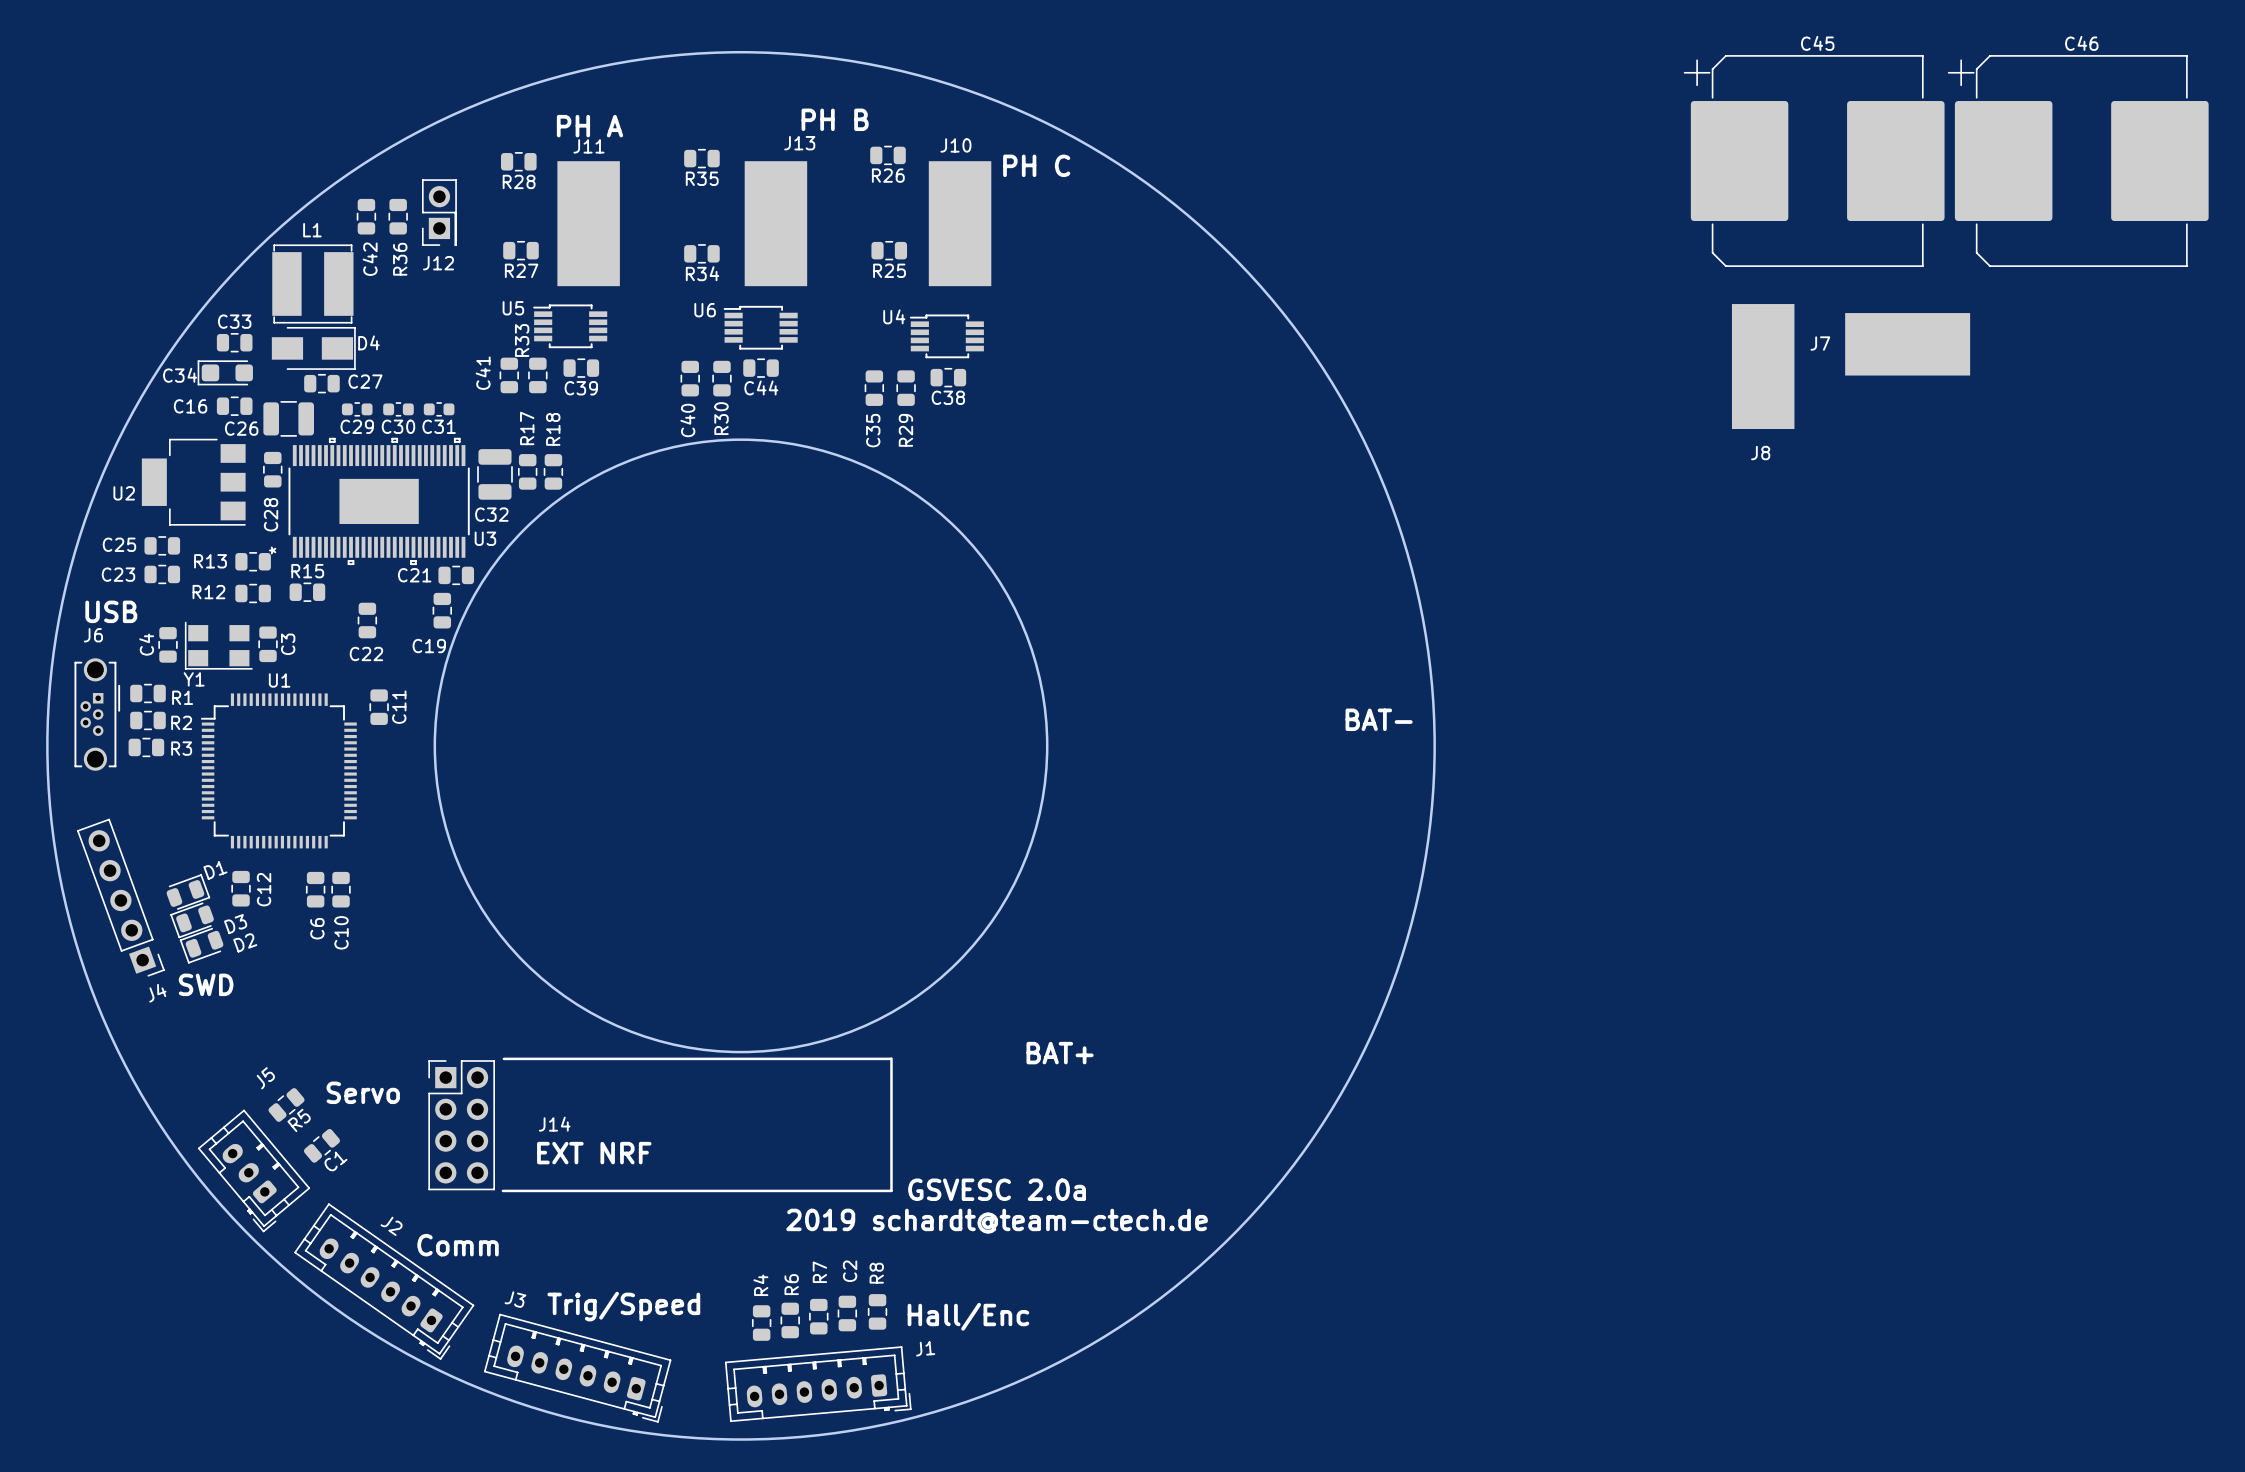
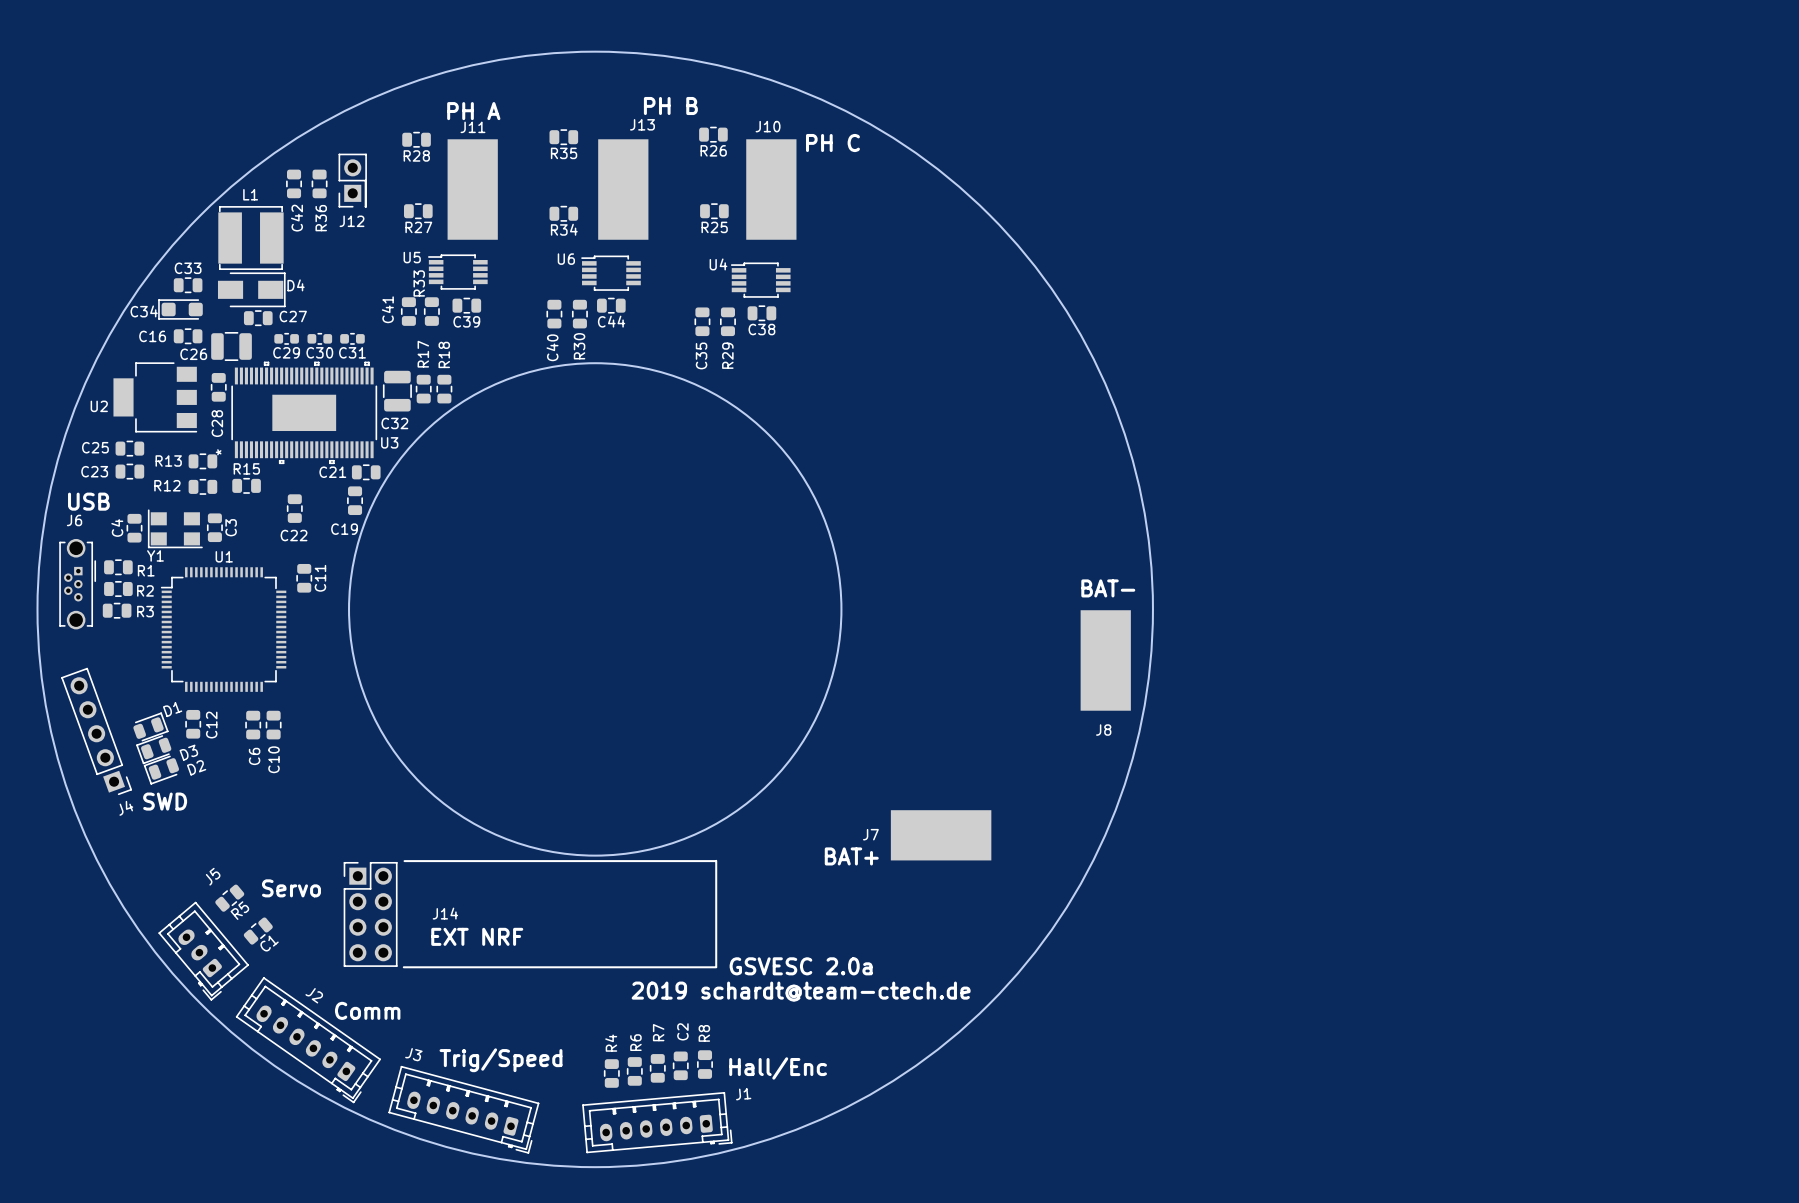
C45: (1814, 161) -> none
C46: (2078, 161) -> none
J7 position: (1907, 344) -> (941, 835)
J8 position: (1763, 366) -> (1105, 660)

